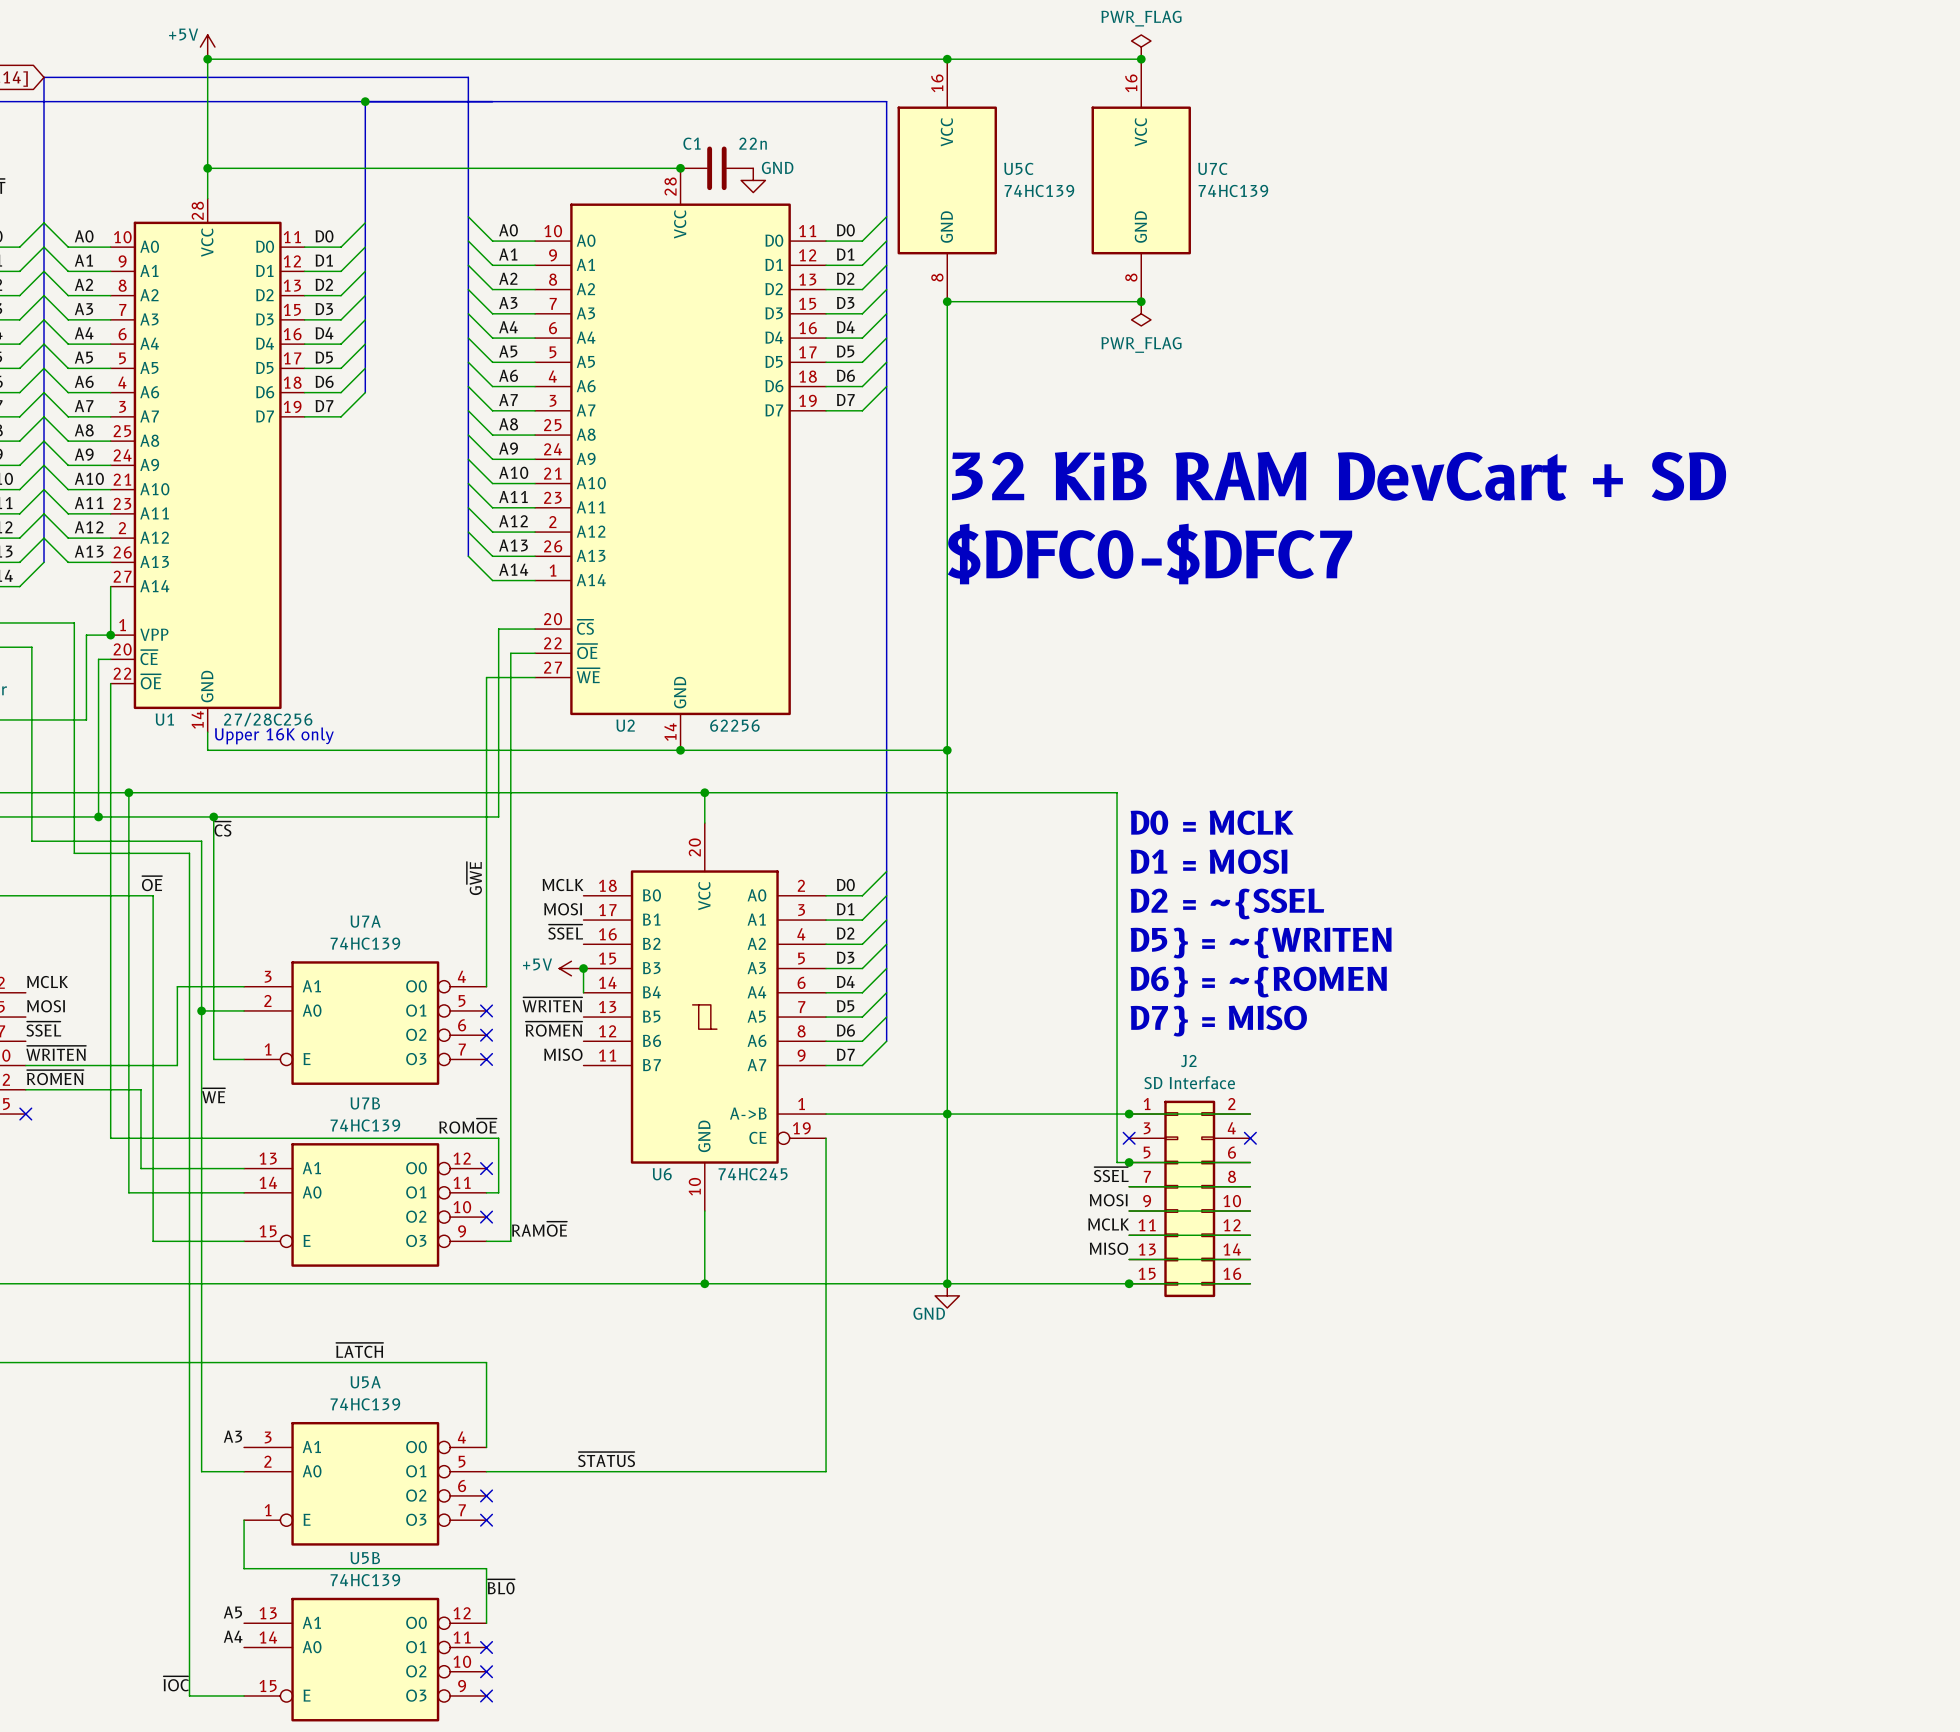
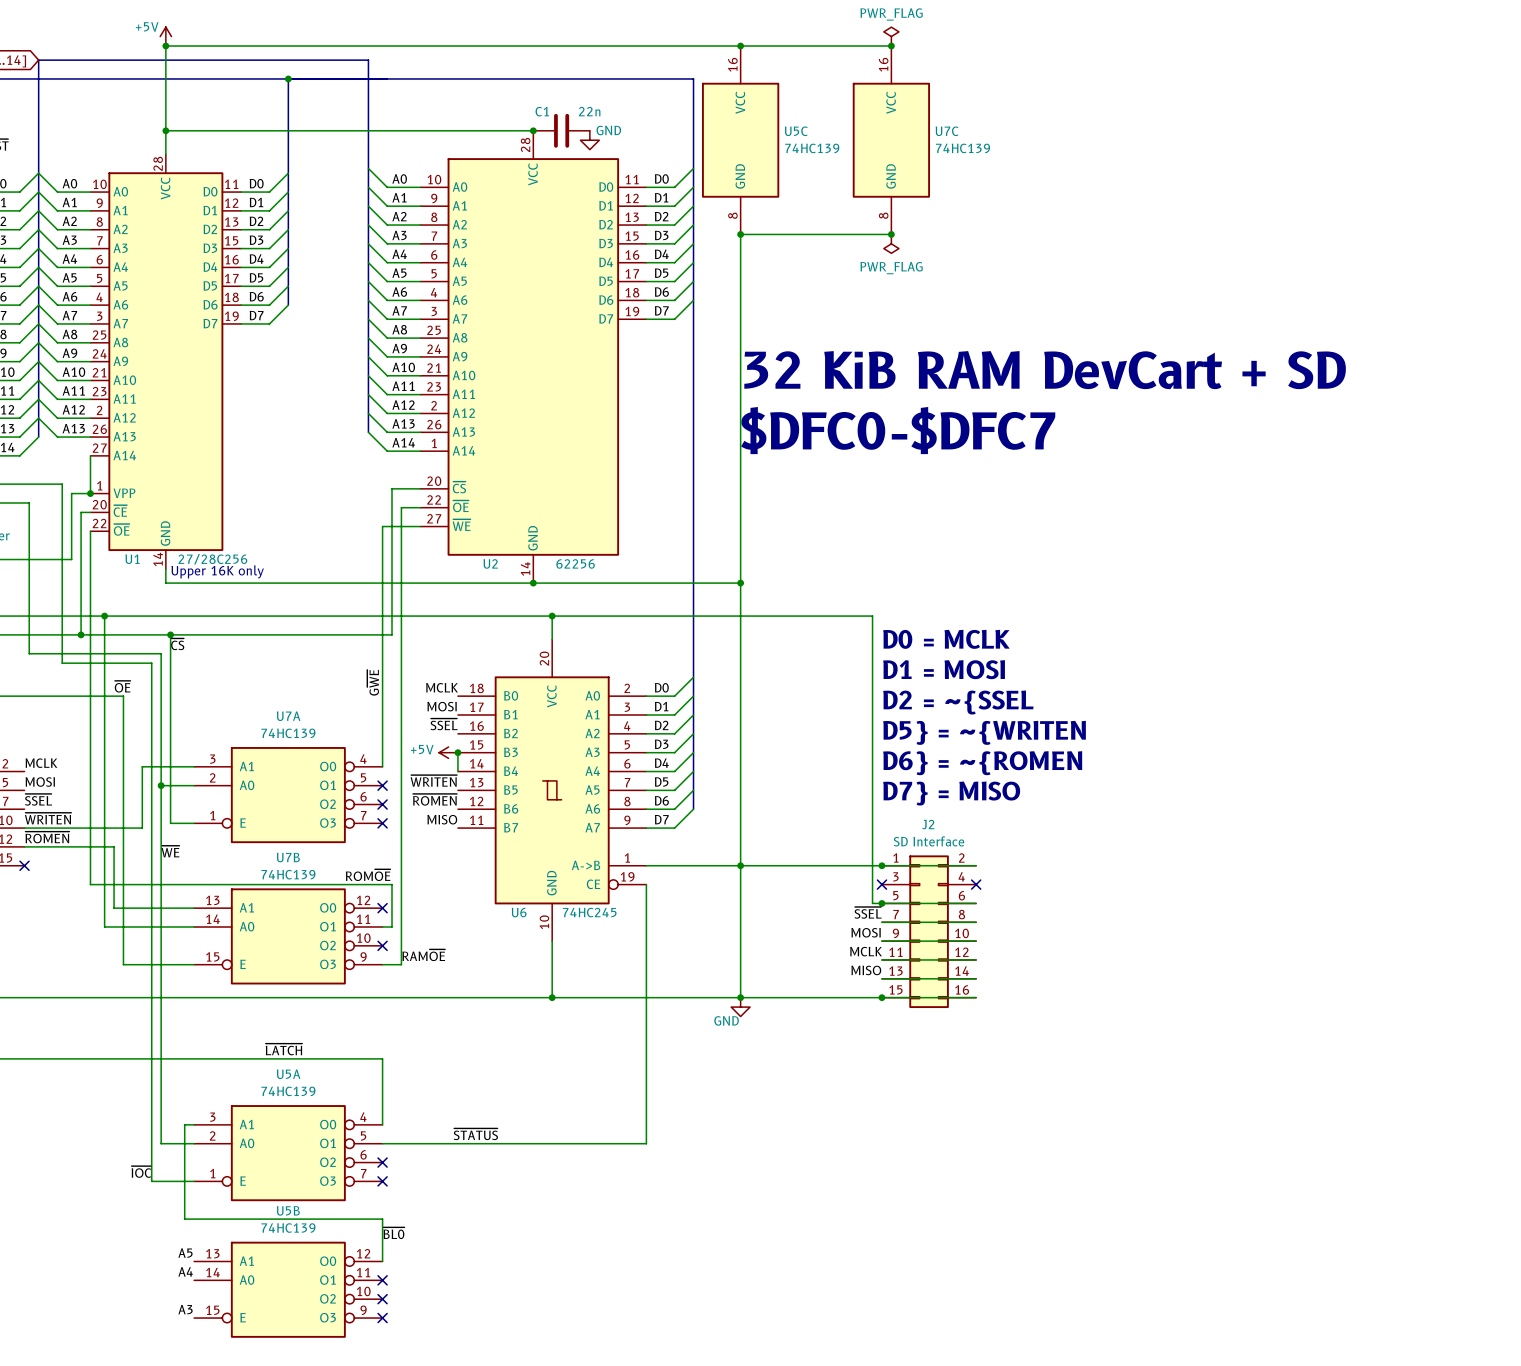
label: A3 (232, 1436) -> none
wire: (189, 1520) (189, 1695) (244, 1695) -> (151, 1181) (194, 1181)
wire: (244, 1520) (244, 1568) -> (194, 1124) (184, 1124) (184, 1219) (194, 1219)
label position: ~{IOC} (176, 1683) -> ~{IOC} (141, 1171)
label: none -> A3 (185, 1309)

